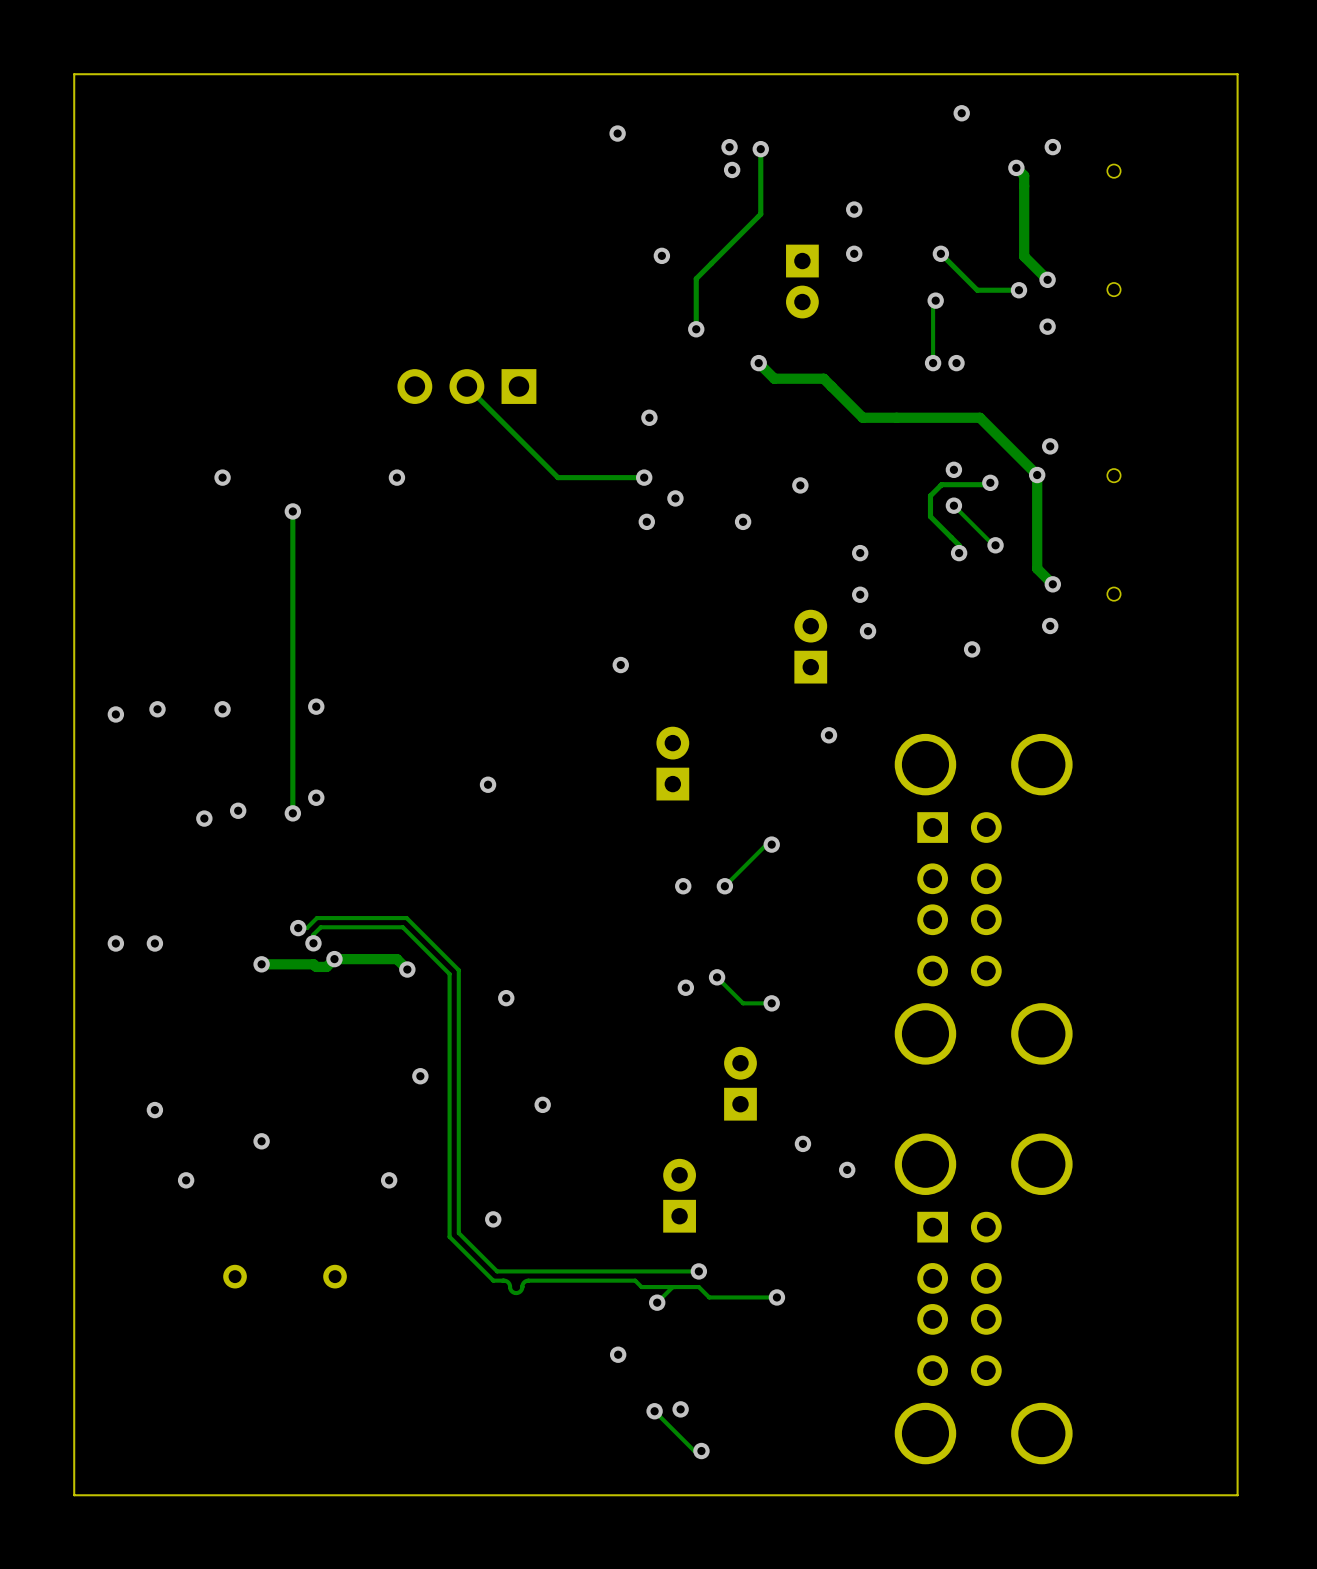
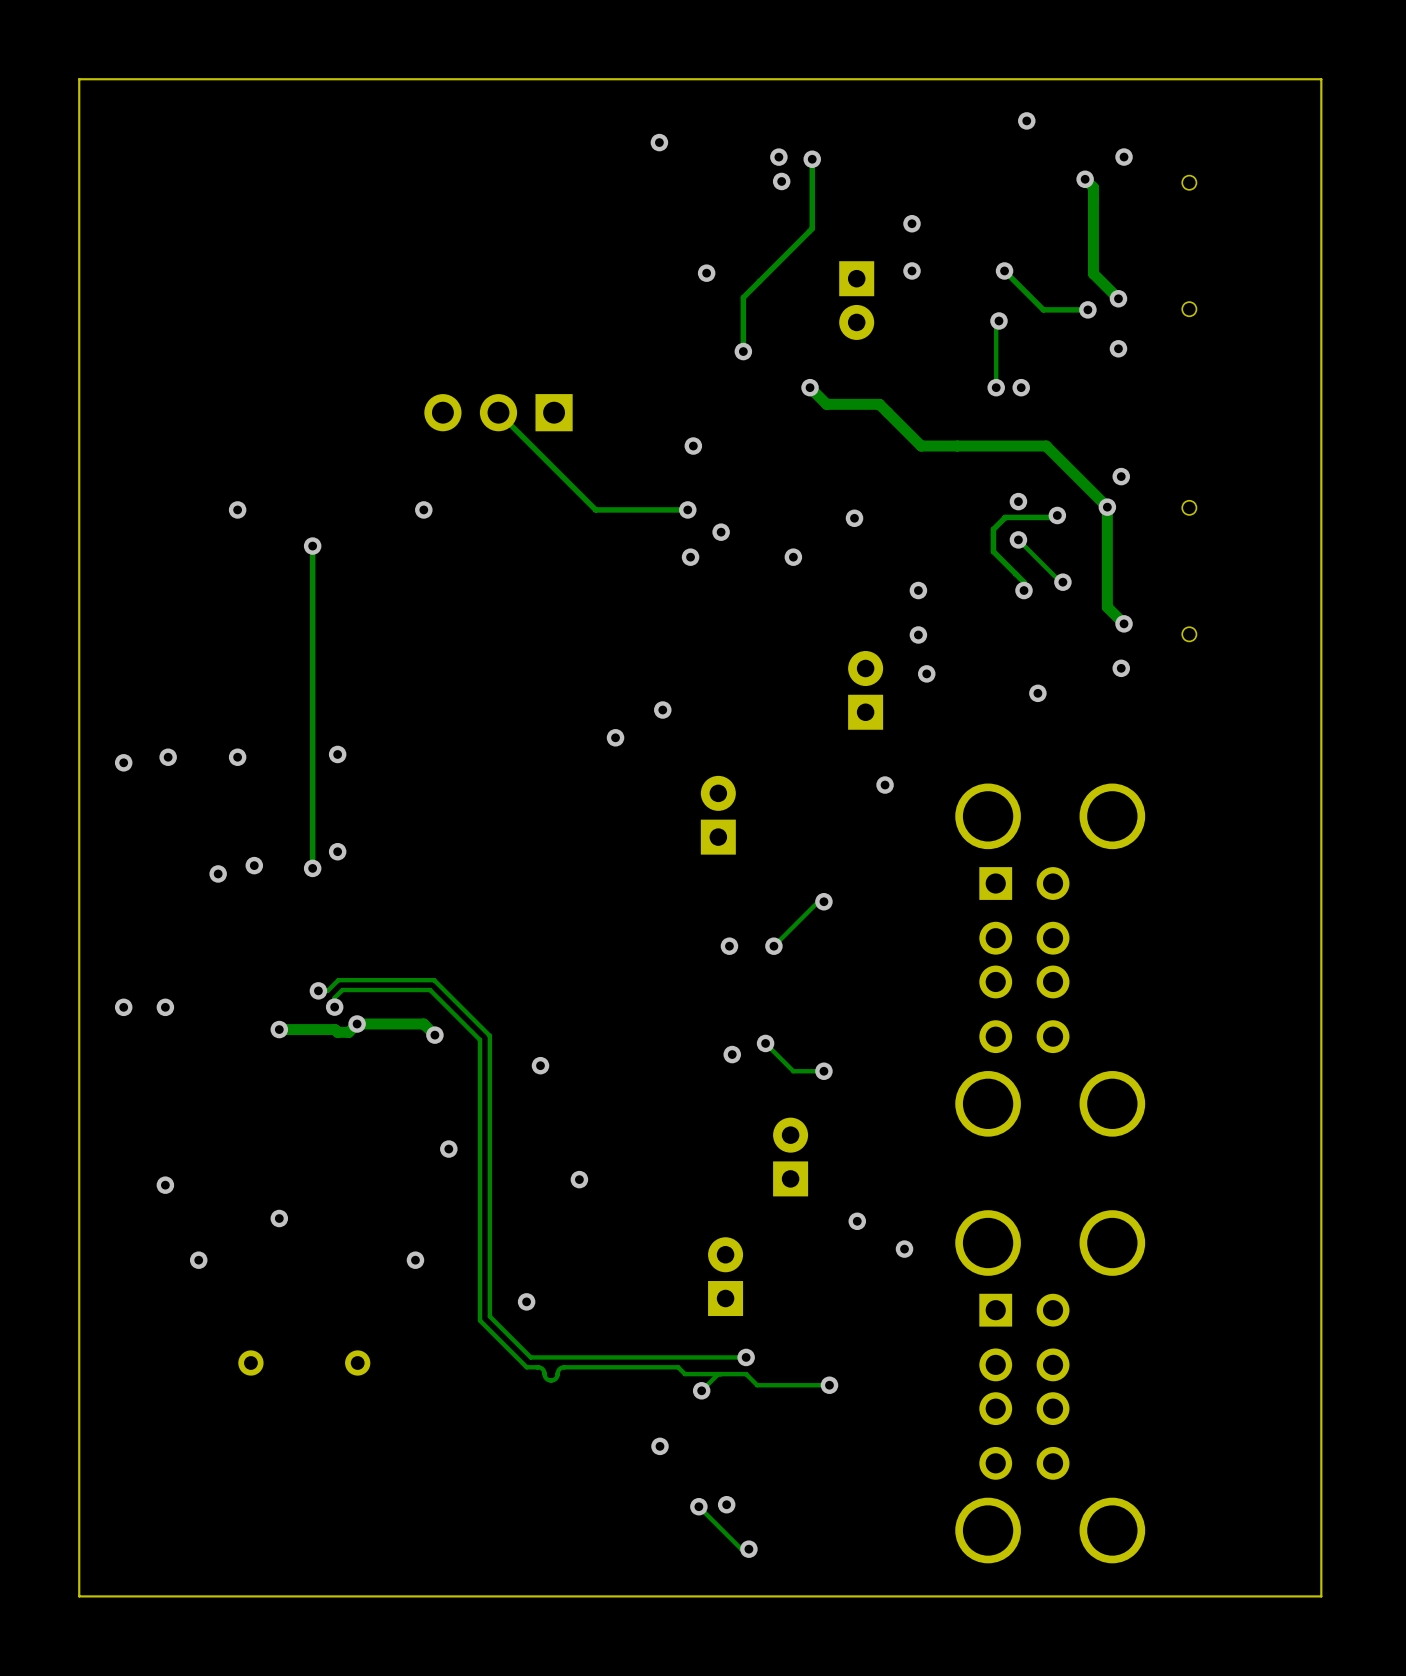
via: none -> (615, 737)
via: (488, 784) -> none

